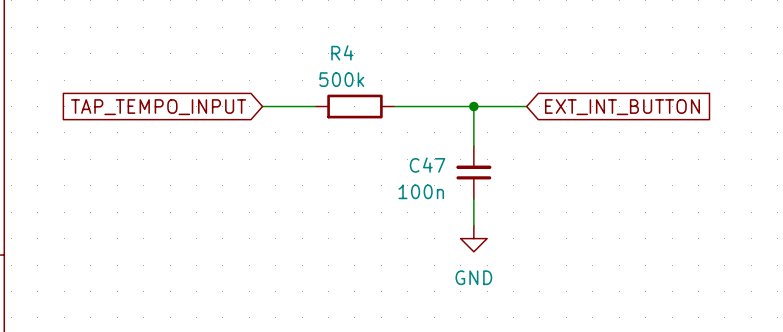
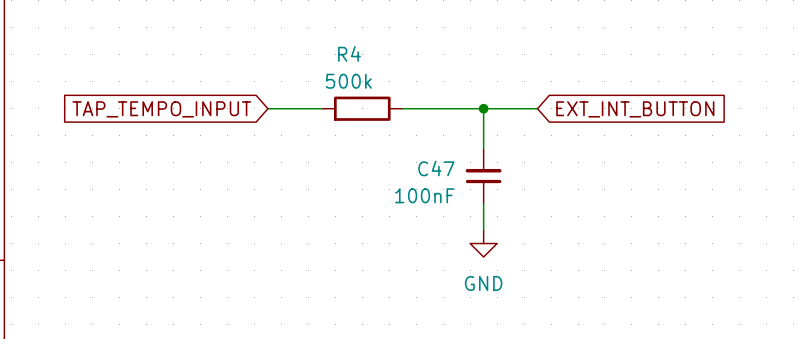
C47 value: 100n (421, 191) -> 100nF (424, 195)

